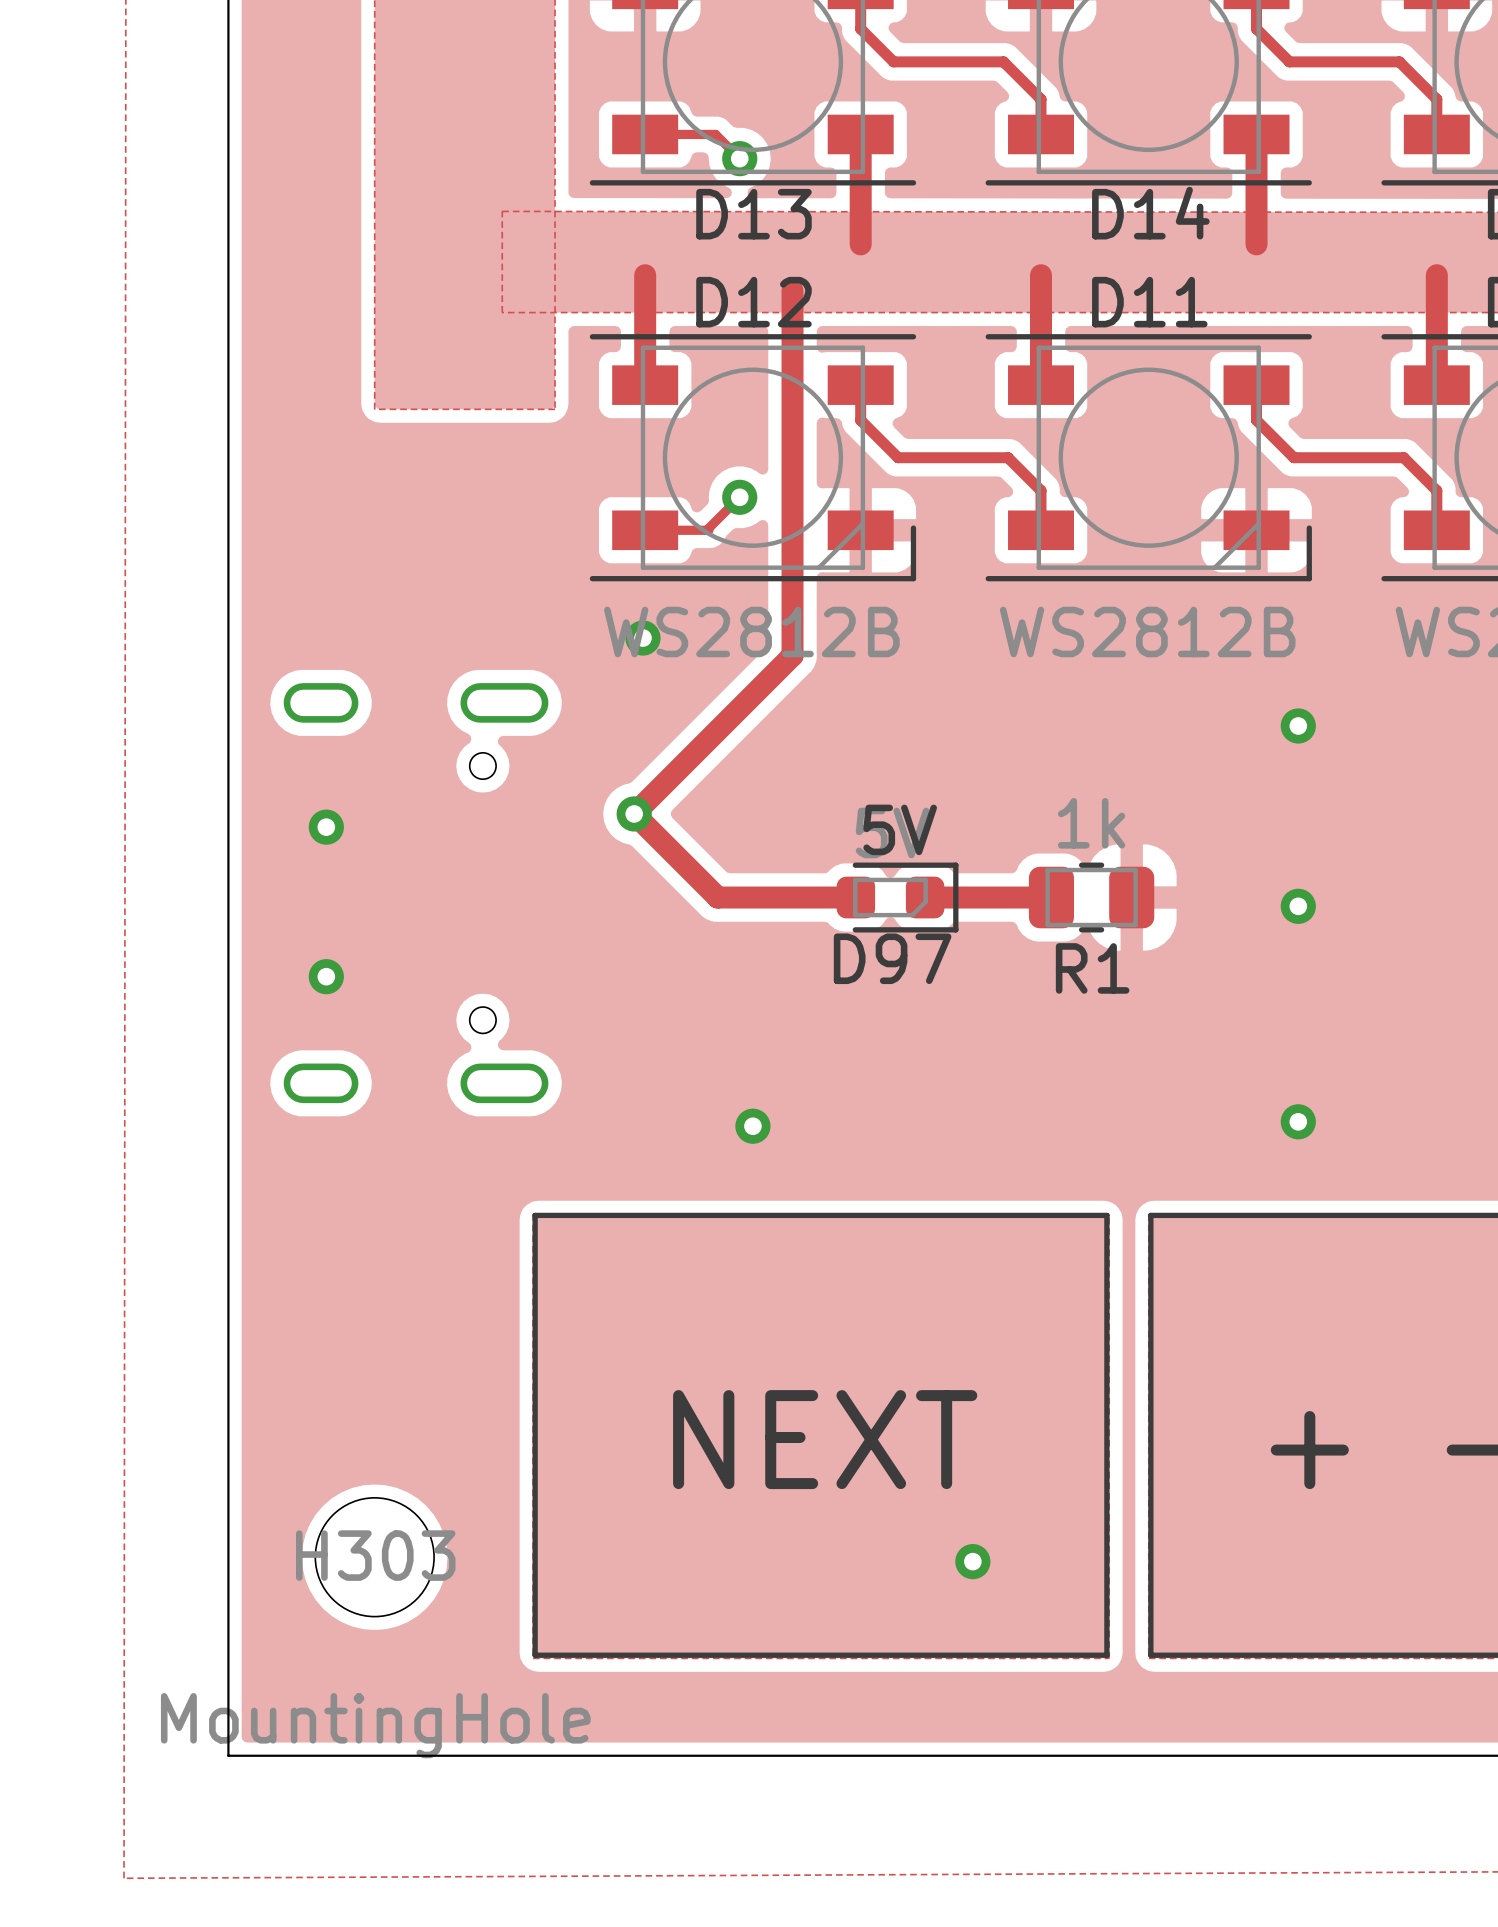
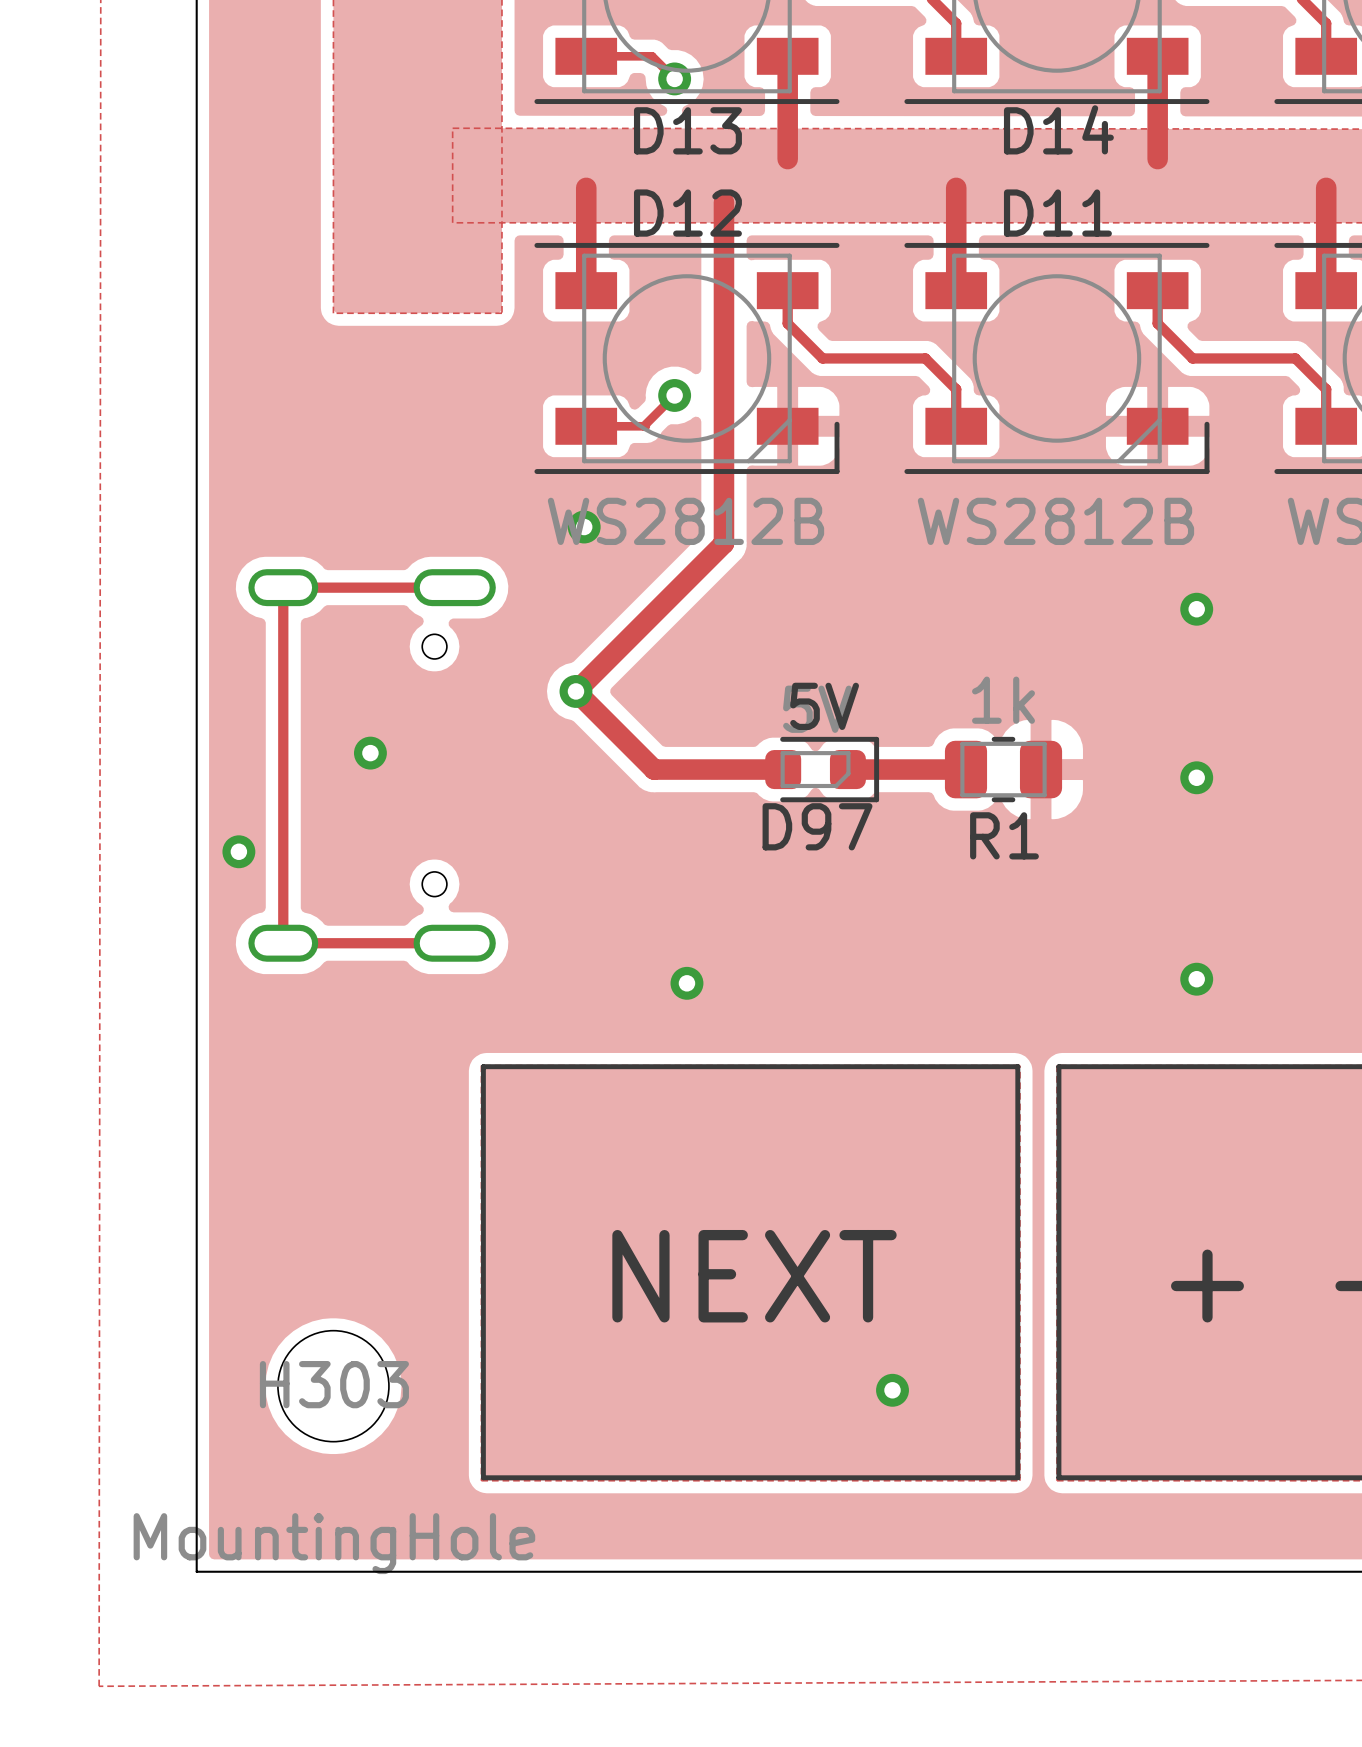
track: none -> (454, 587) (283, 587) (283, 943) (454, 943)
via: (326, 827) -> none
via: none -> (370, 753)
via position: (326, 976) -> (238, 851)

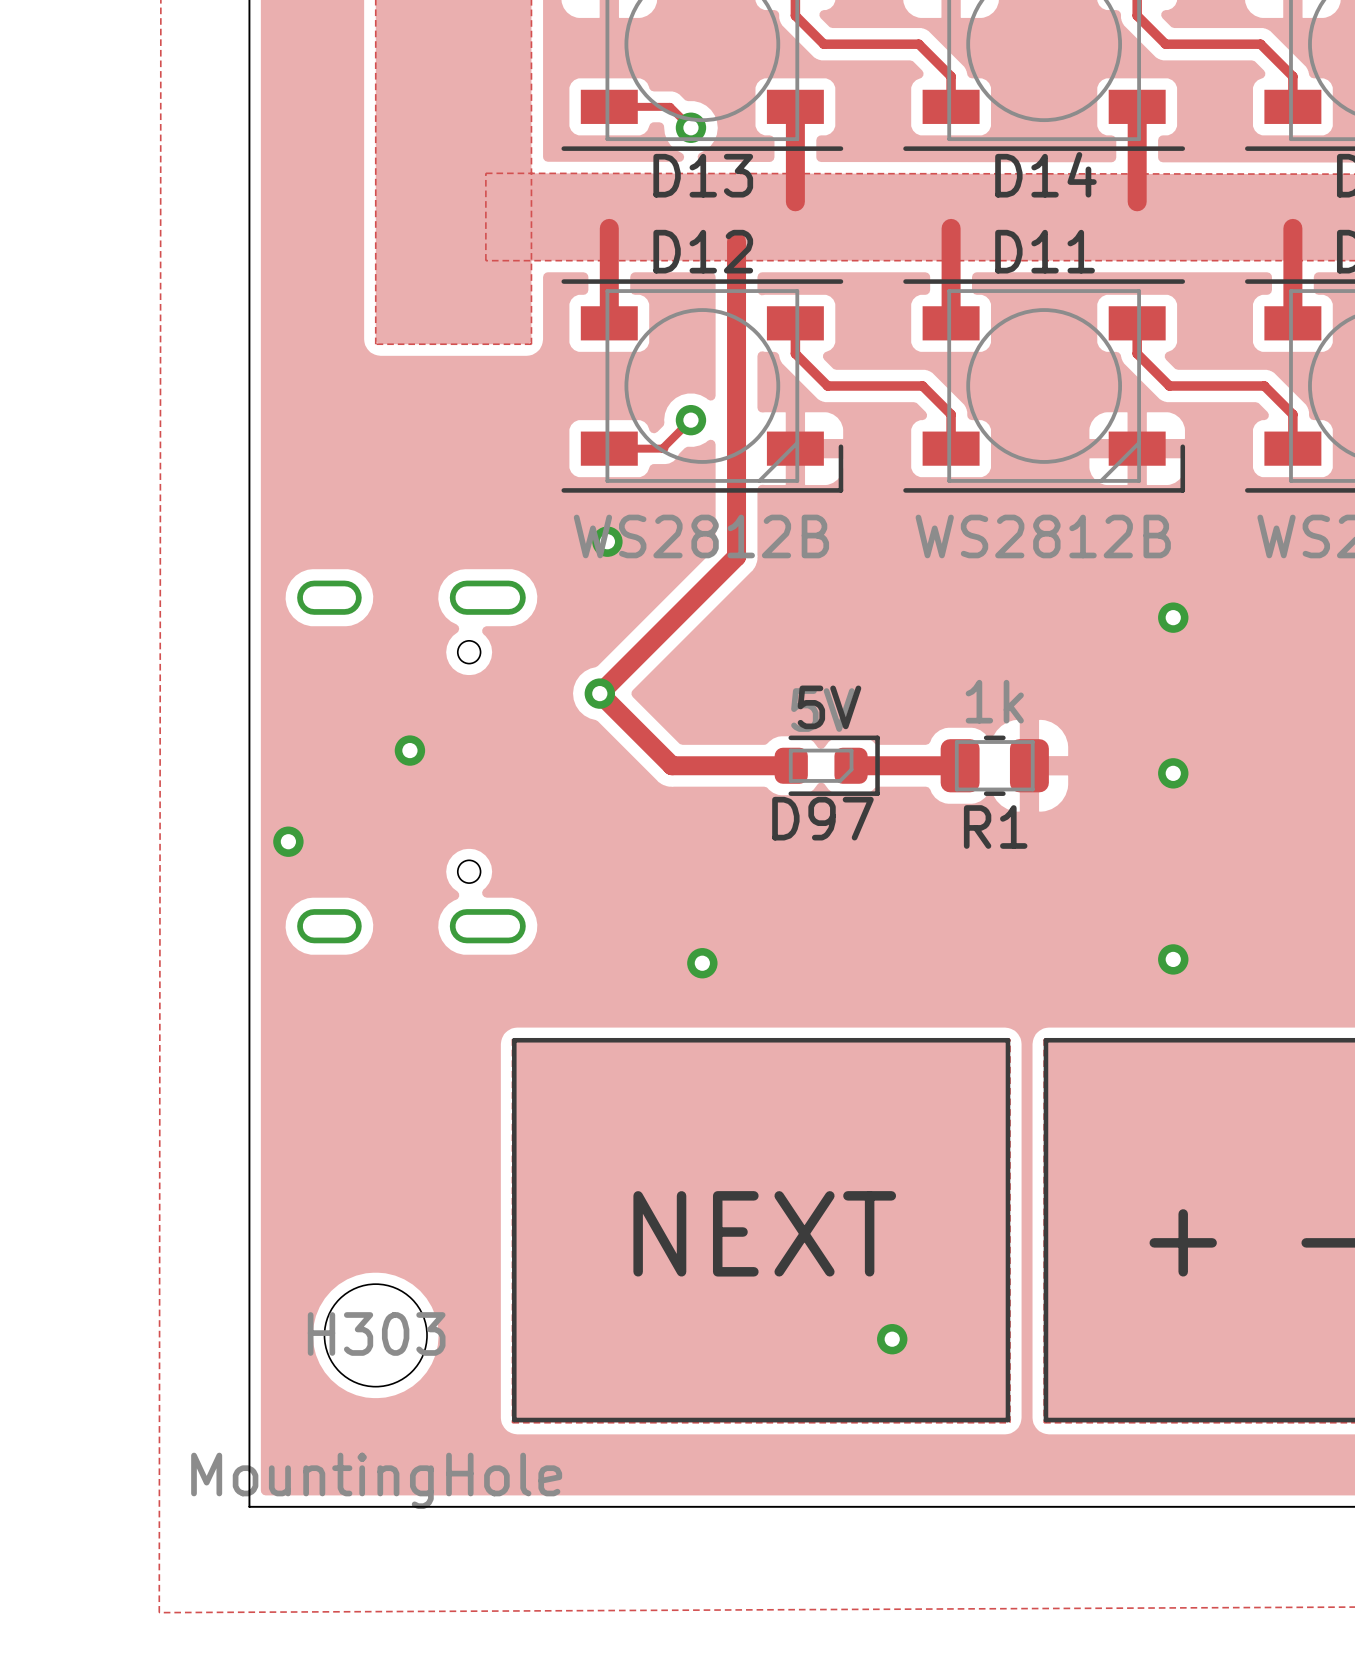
track: (454, 587) (283, 587) (283, 943) (454, 943) -> none

